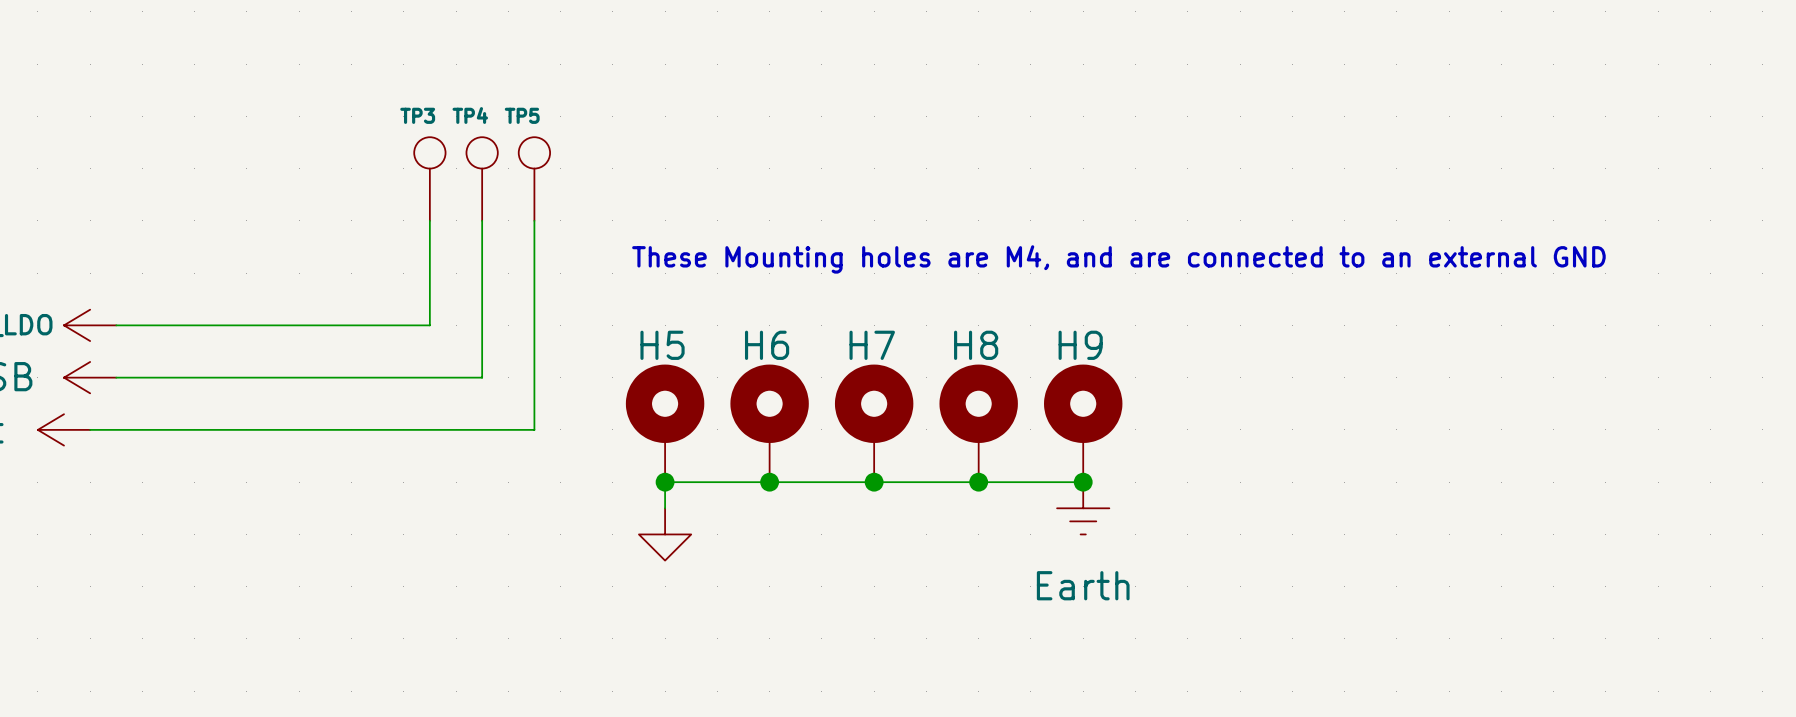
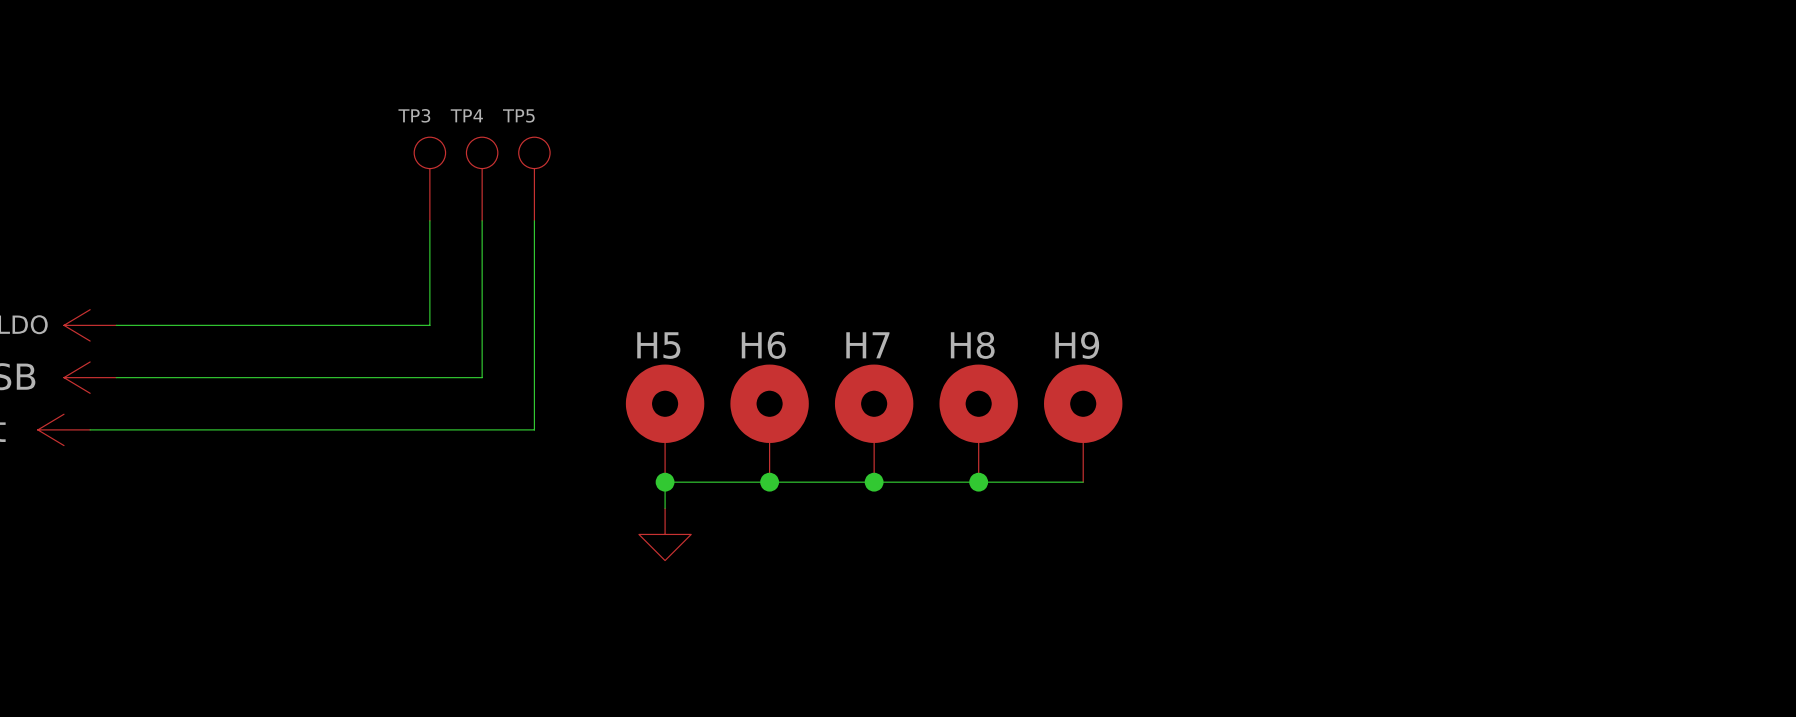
text: These Mounting holes are M4, and are connected to an external GND (1118, 259) -> none
junction: (1083, 482) -> none
power symbol: Earth (1083, 508) -> none

